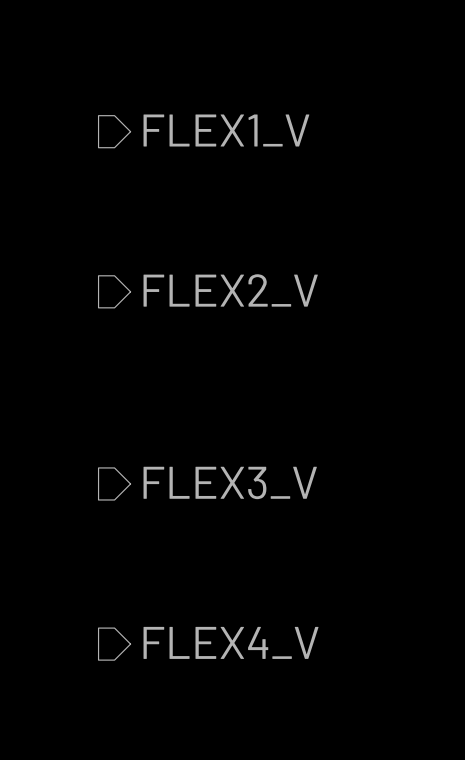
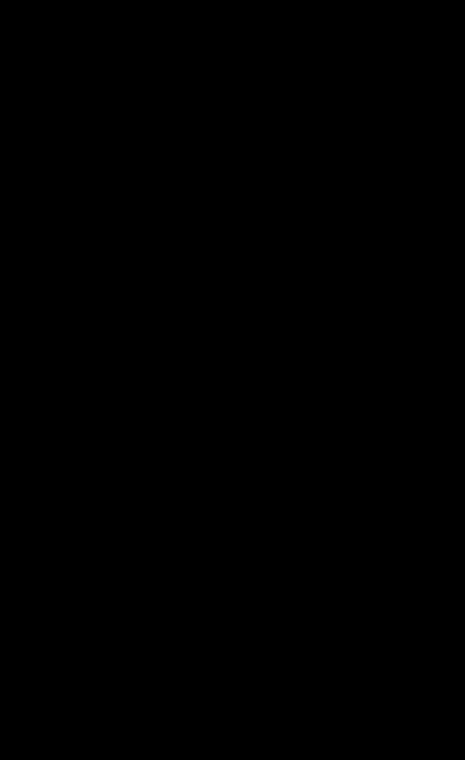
hierarchical label: FLEX1_V (226, 130) -> none
hierarchical label: FLEX2_V (230, 290) -> none
hierarchical label: FLEX3_V (230, 482) -> none
hierarchical label: FLEX4_V (231, 642) -> none

